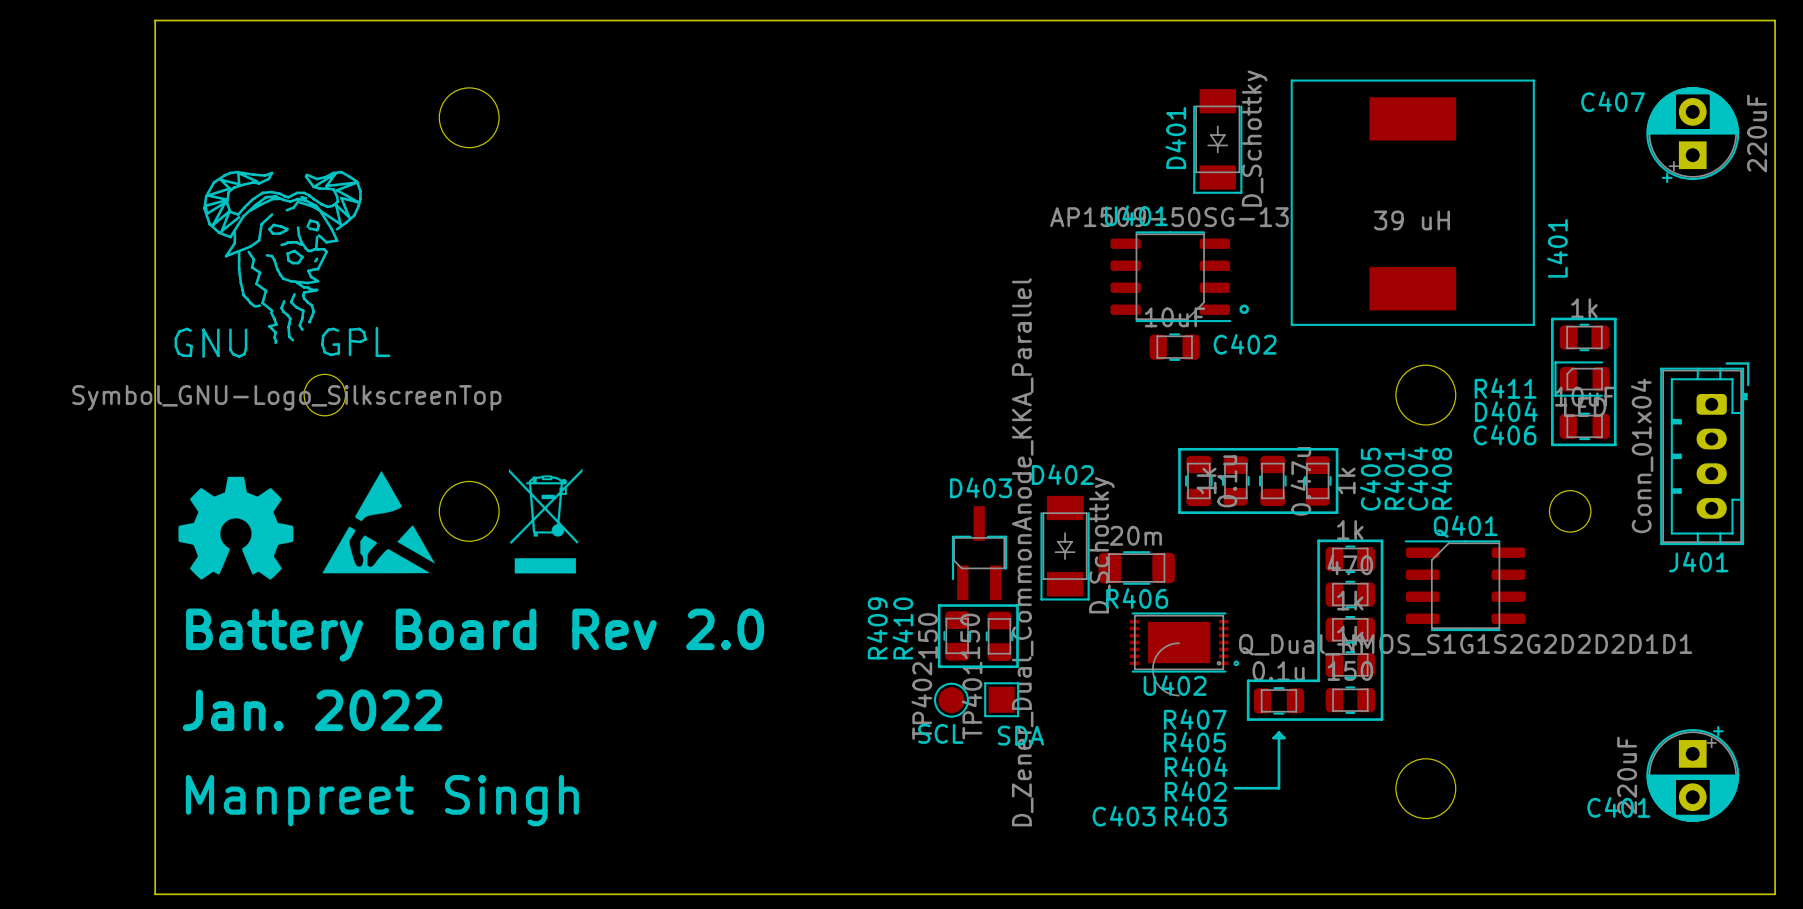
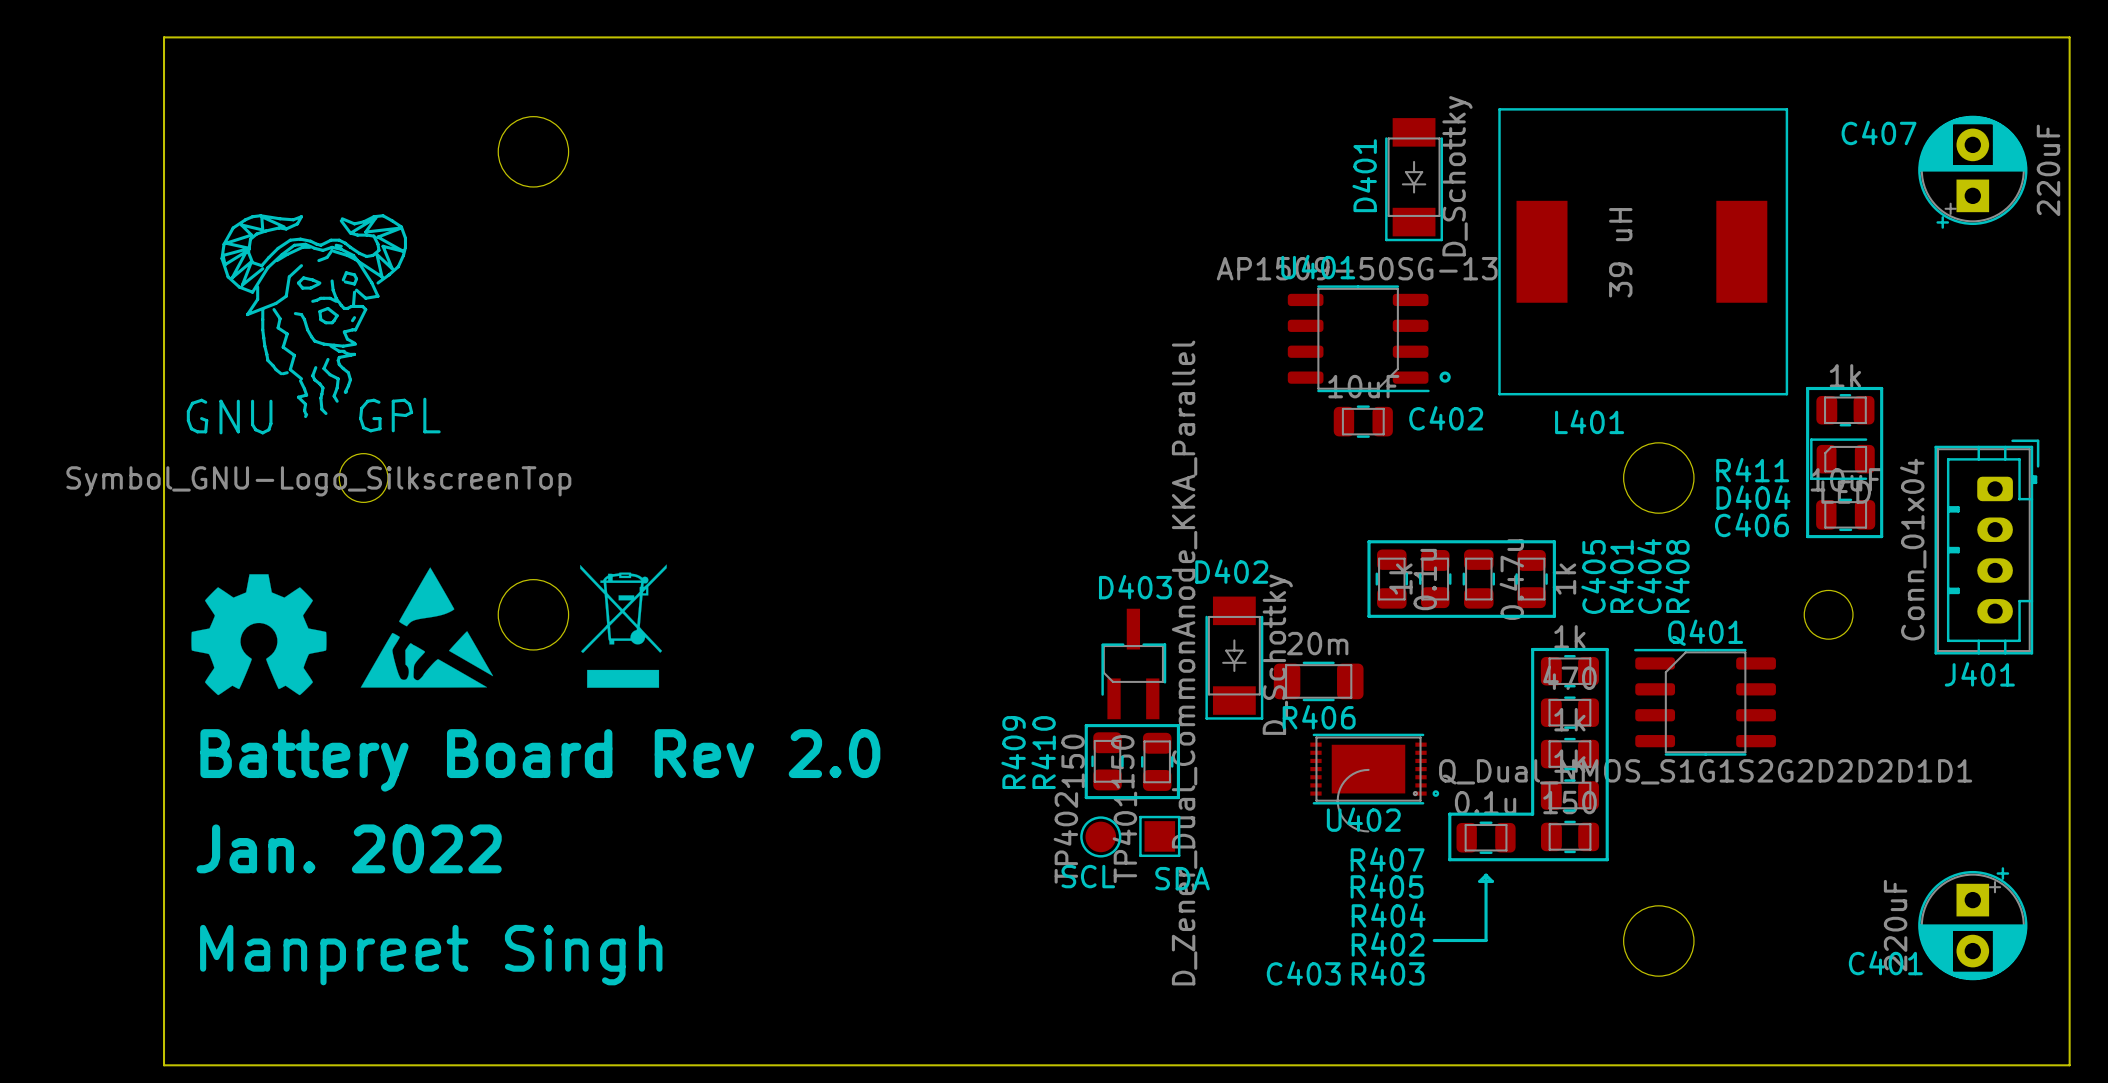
L401 rotation: 0° (1412, 202) -> 90° clockwise (1643, 251)

